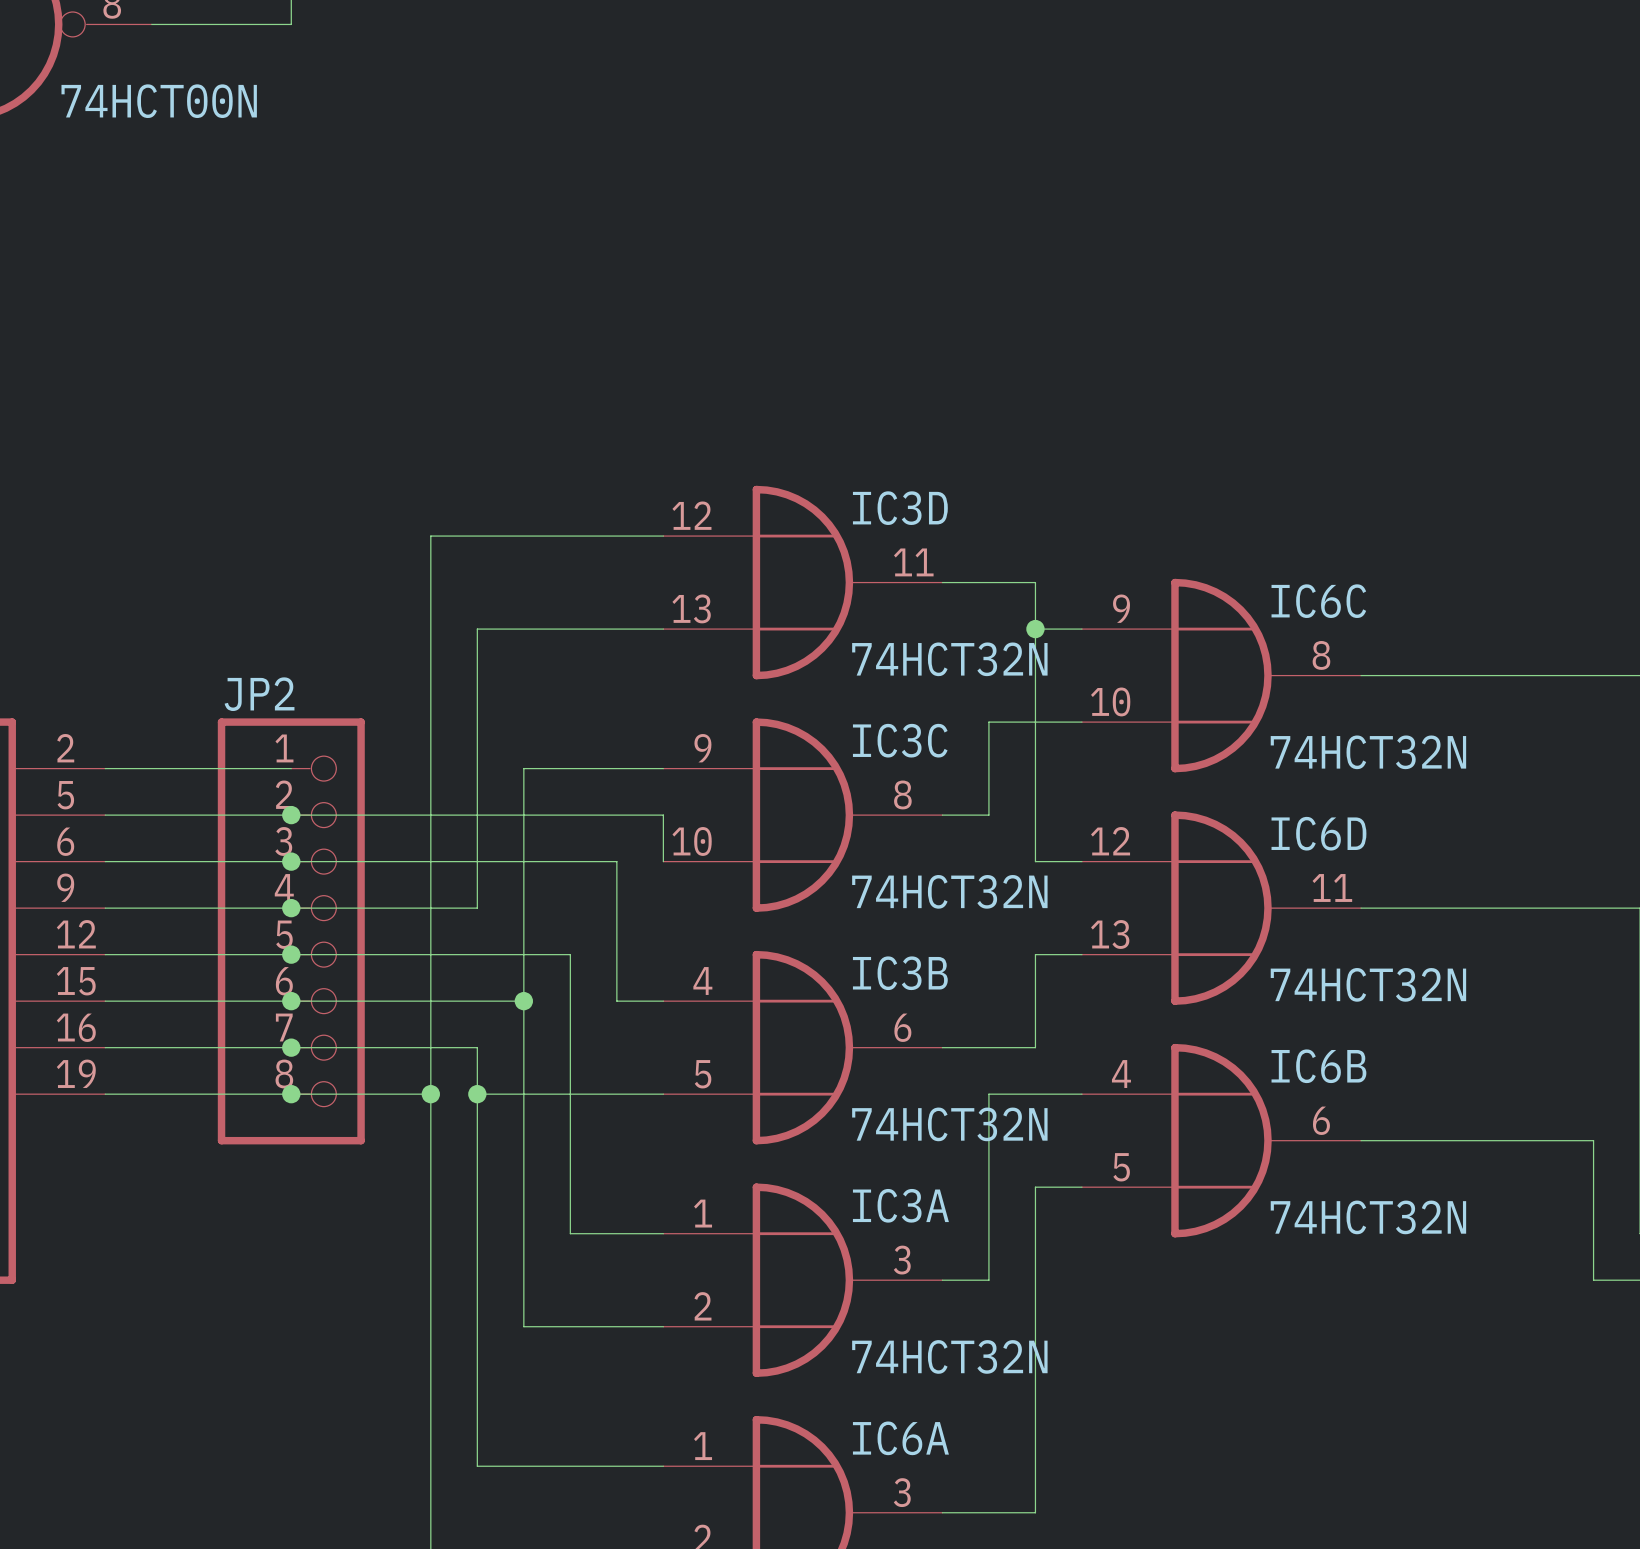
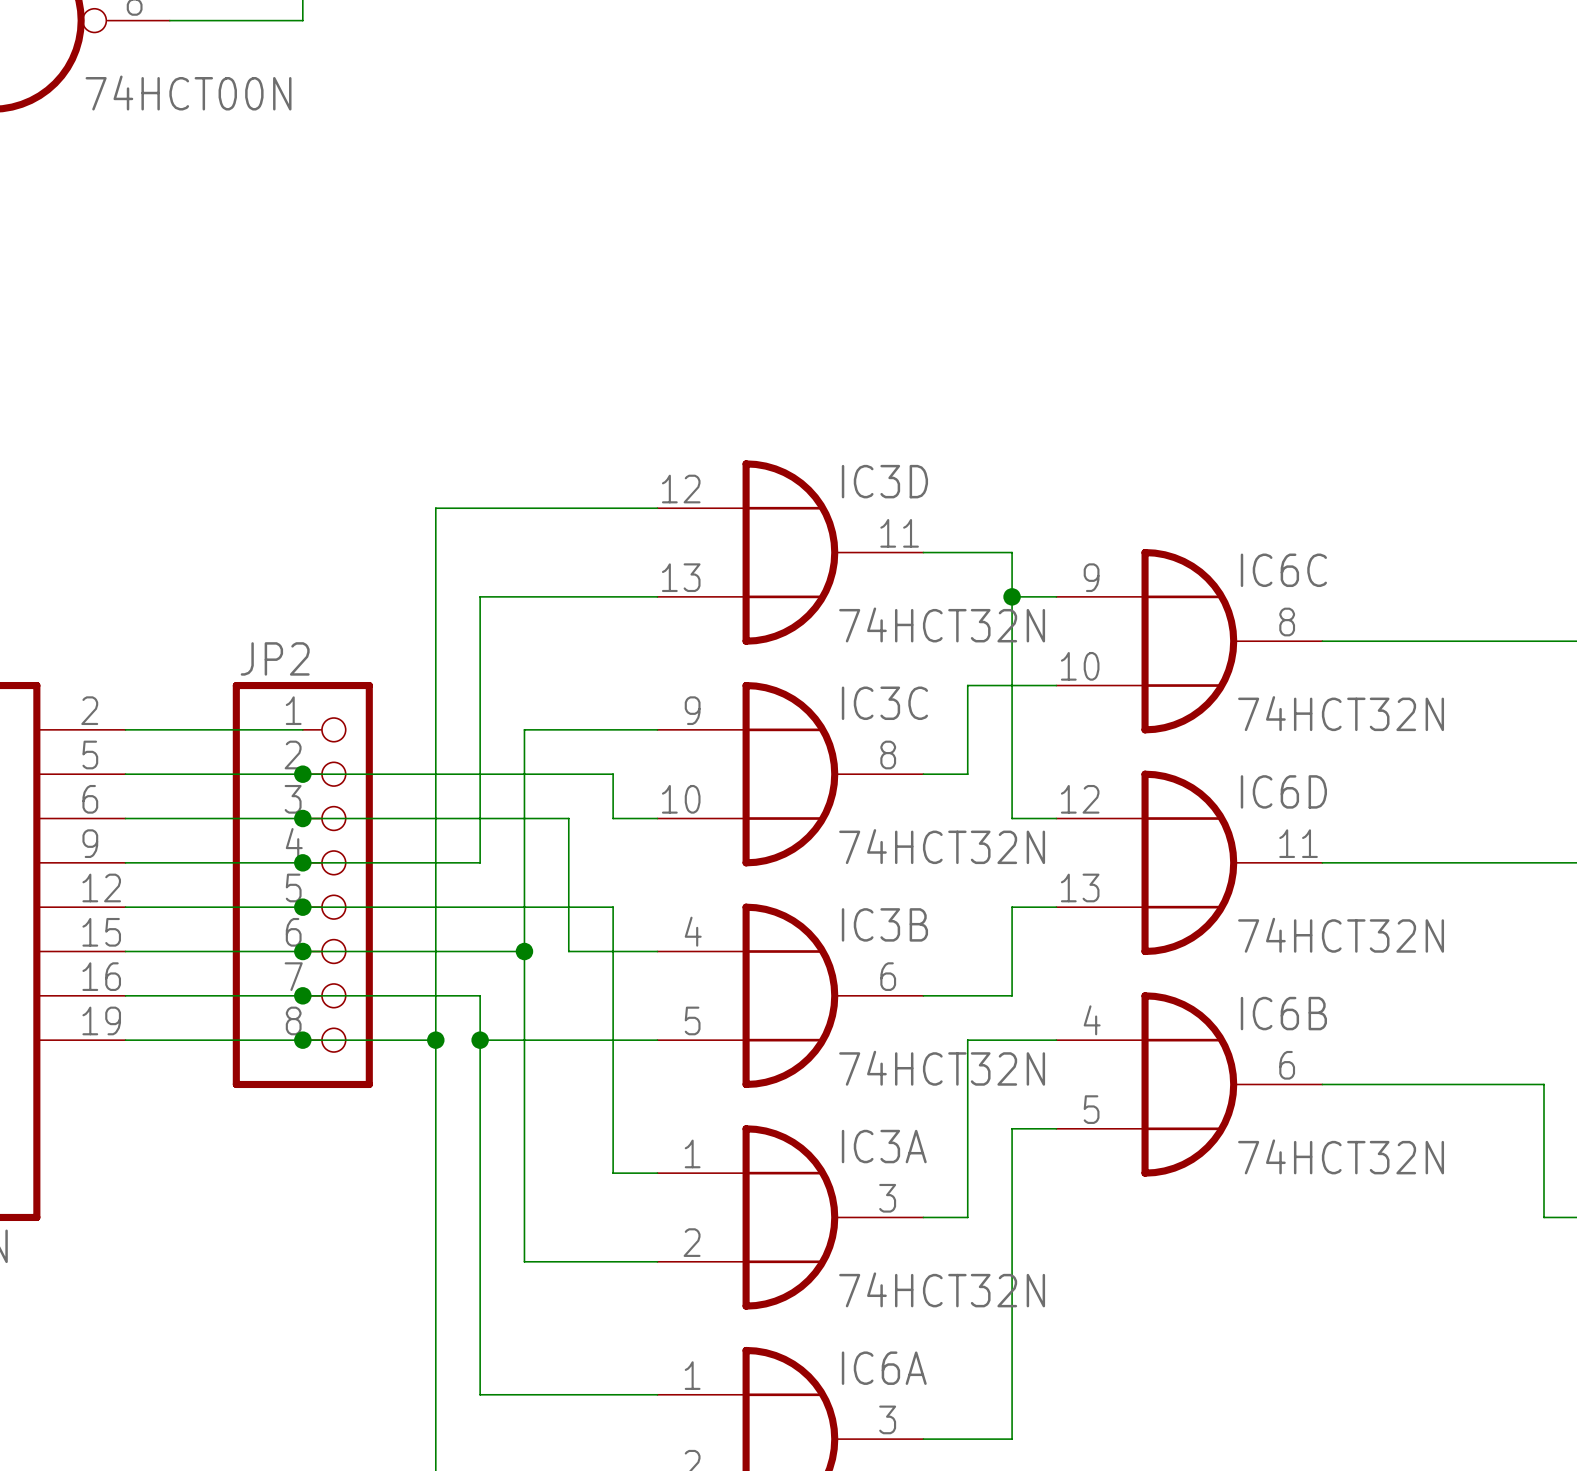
wire: (616, 815) (663, 815) (663, 861) -> (613, 774) (613, 818) (657, 818)
wire: (570, 861) (616, 861) (616, 954) -> (568, 818) (568, 907) (613, 907)
wire: (570, 1001) (570, 1233) (616, 1233) -> (568, 951) (613, 951) (613, 1173)

